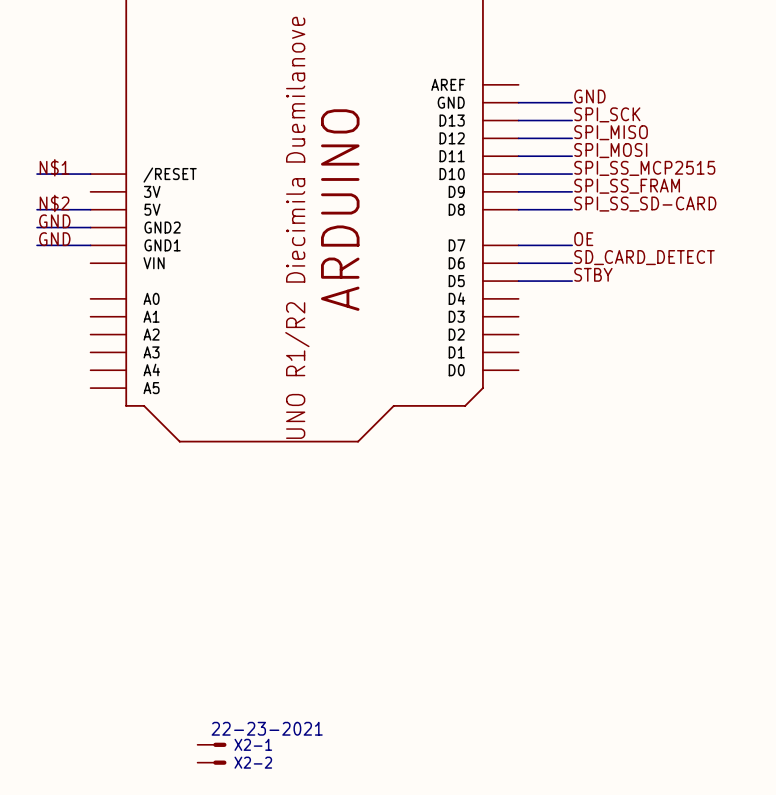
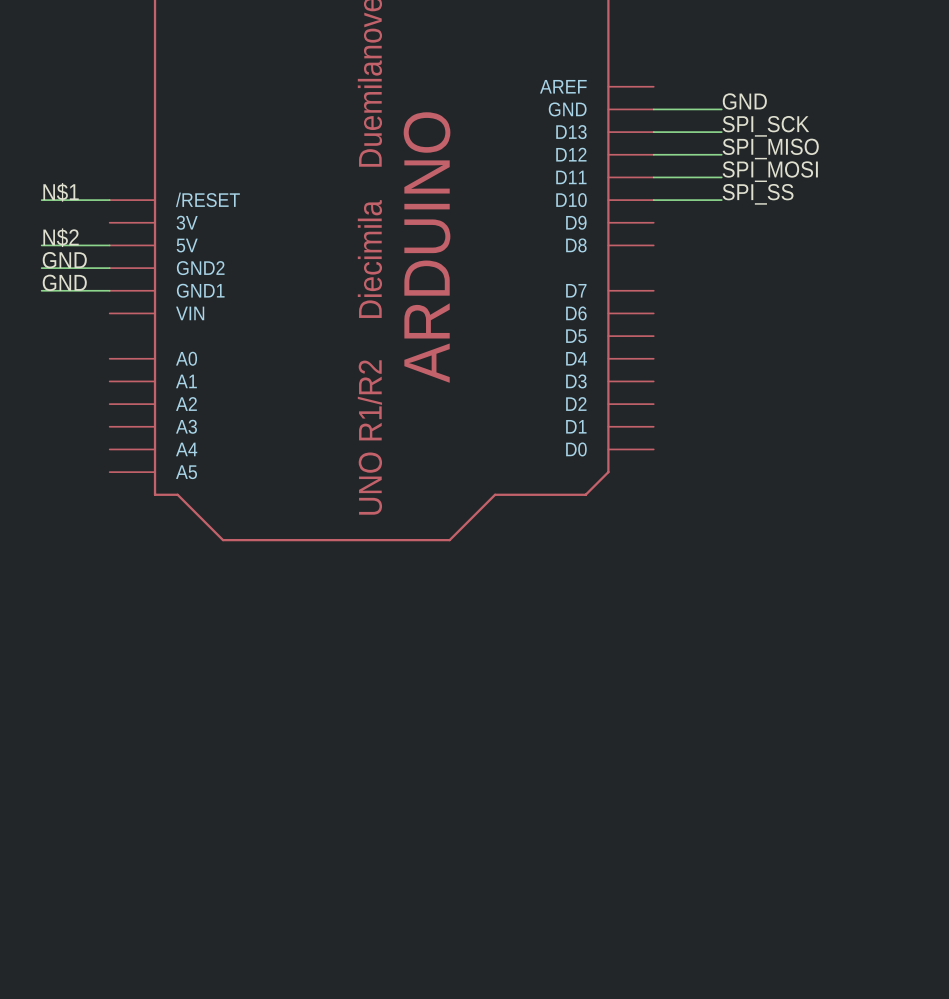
label: SPI_SS_MCP2515 (644, 168) -> SPI_SS (758, 194)
label: SPI_SS_FRAM (627, 186) -> none
wire: (518, 191) (572, 191) -> none
label: SPI_SS_SD-CARD (645, 204) -> none
wire: (518, 209) (572, 209) -> none
label: OE (583, 239) -> none
wire: (518, 245) (572, 245) -> none
label: SD_CARD_DETECT (644, 257) -> none
wire: (518, 263) (572, 263) -> none
label: STBY (593, 274) -> none
wire: (518, 281) (572, 281) -> none
X2-1: 22-23-2021 (212, 744) -> none
X2-2: (212, 762) -> none

